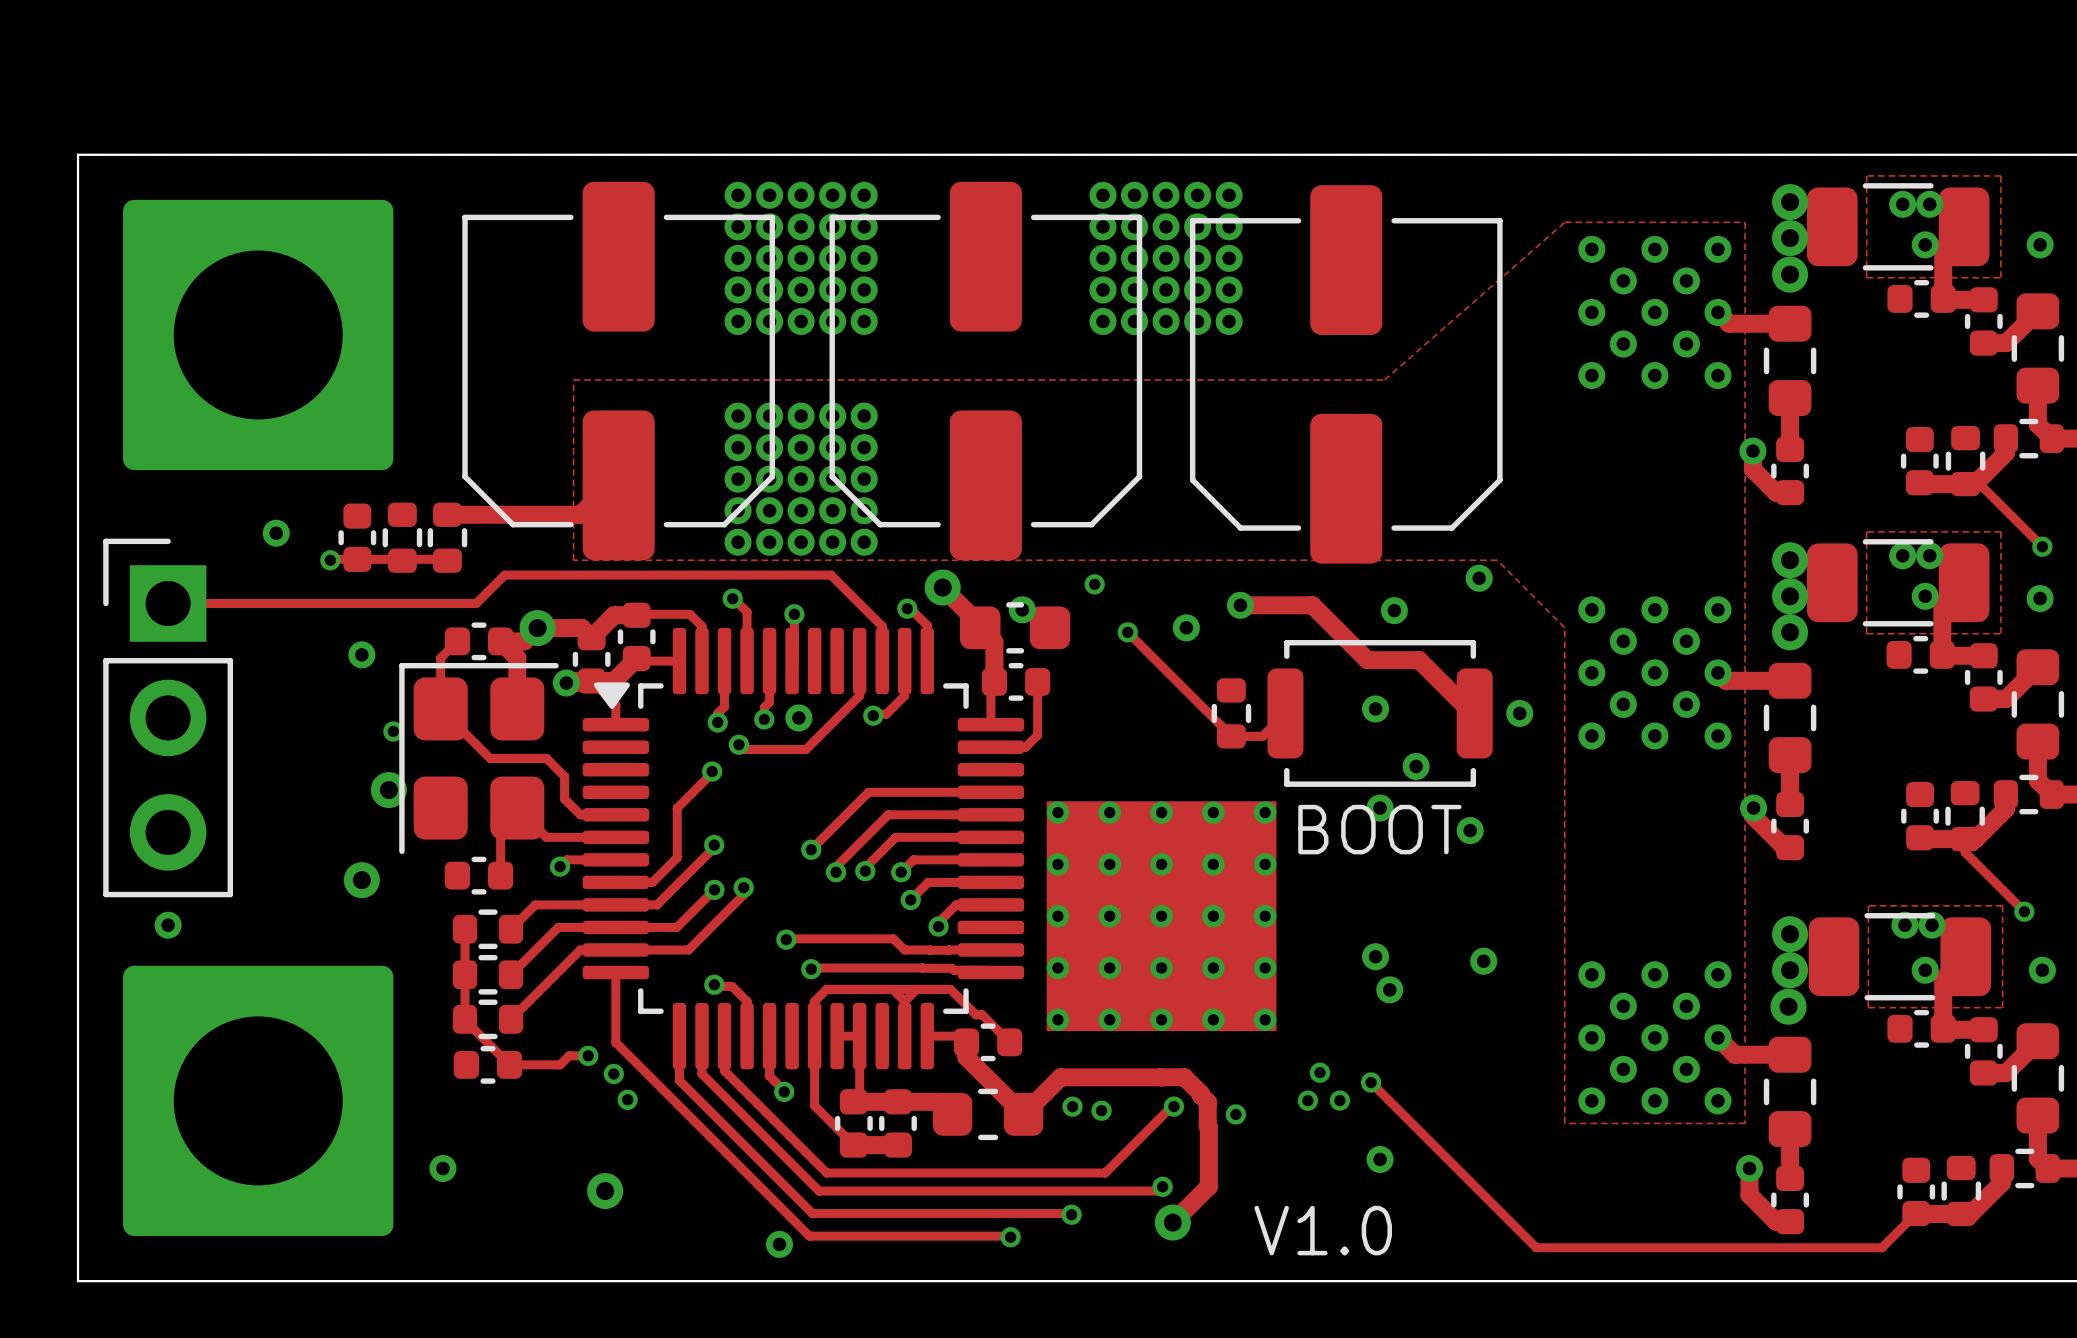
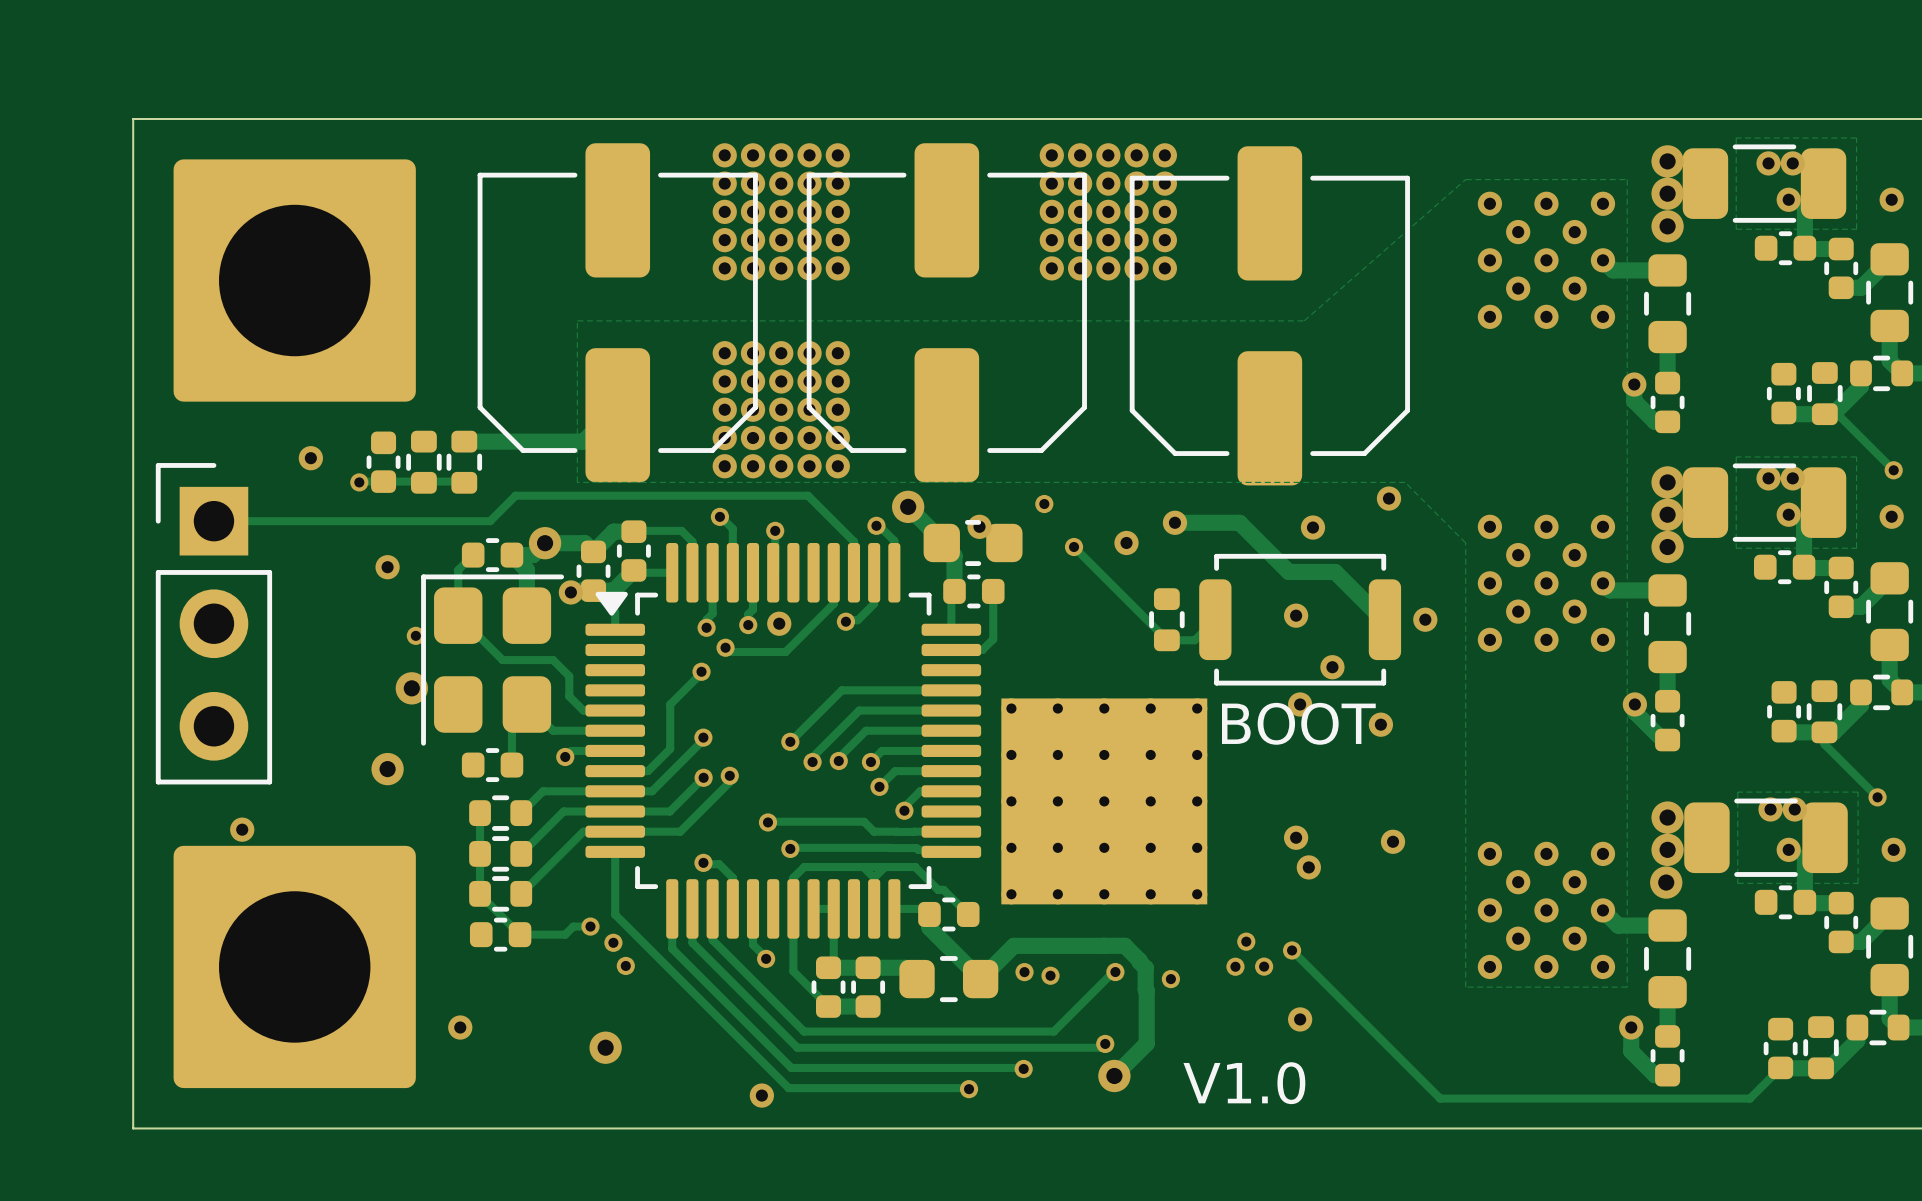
via position: (168, 925) -> (242, 829)

